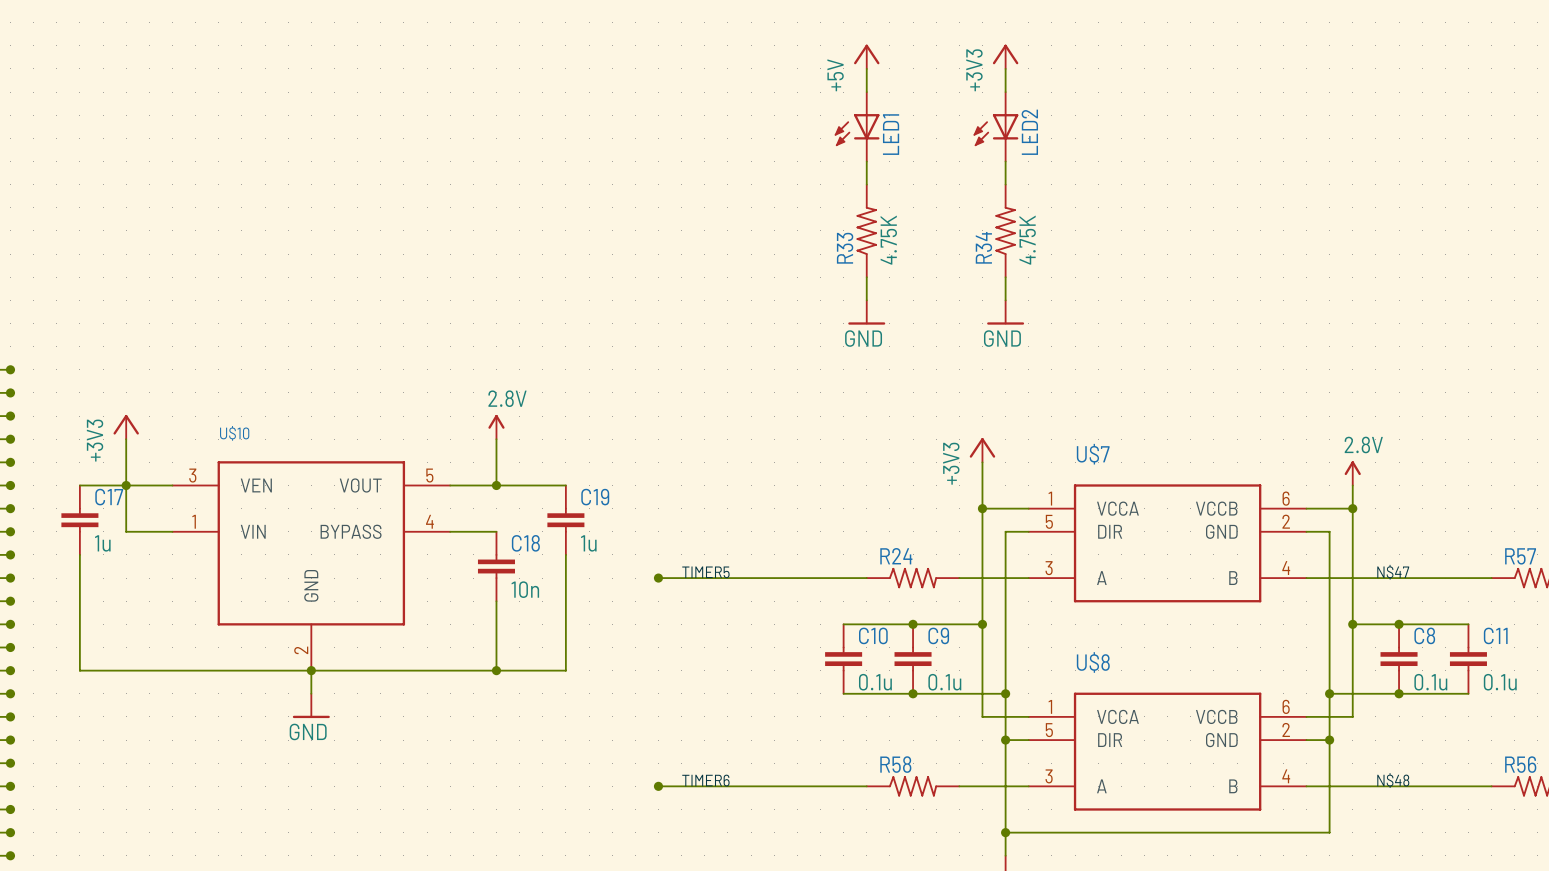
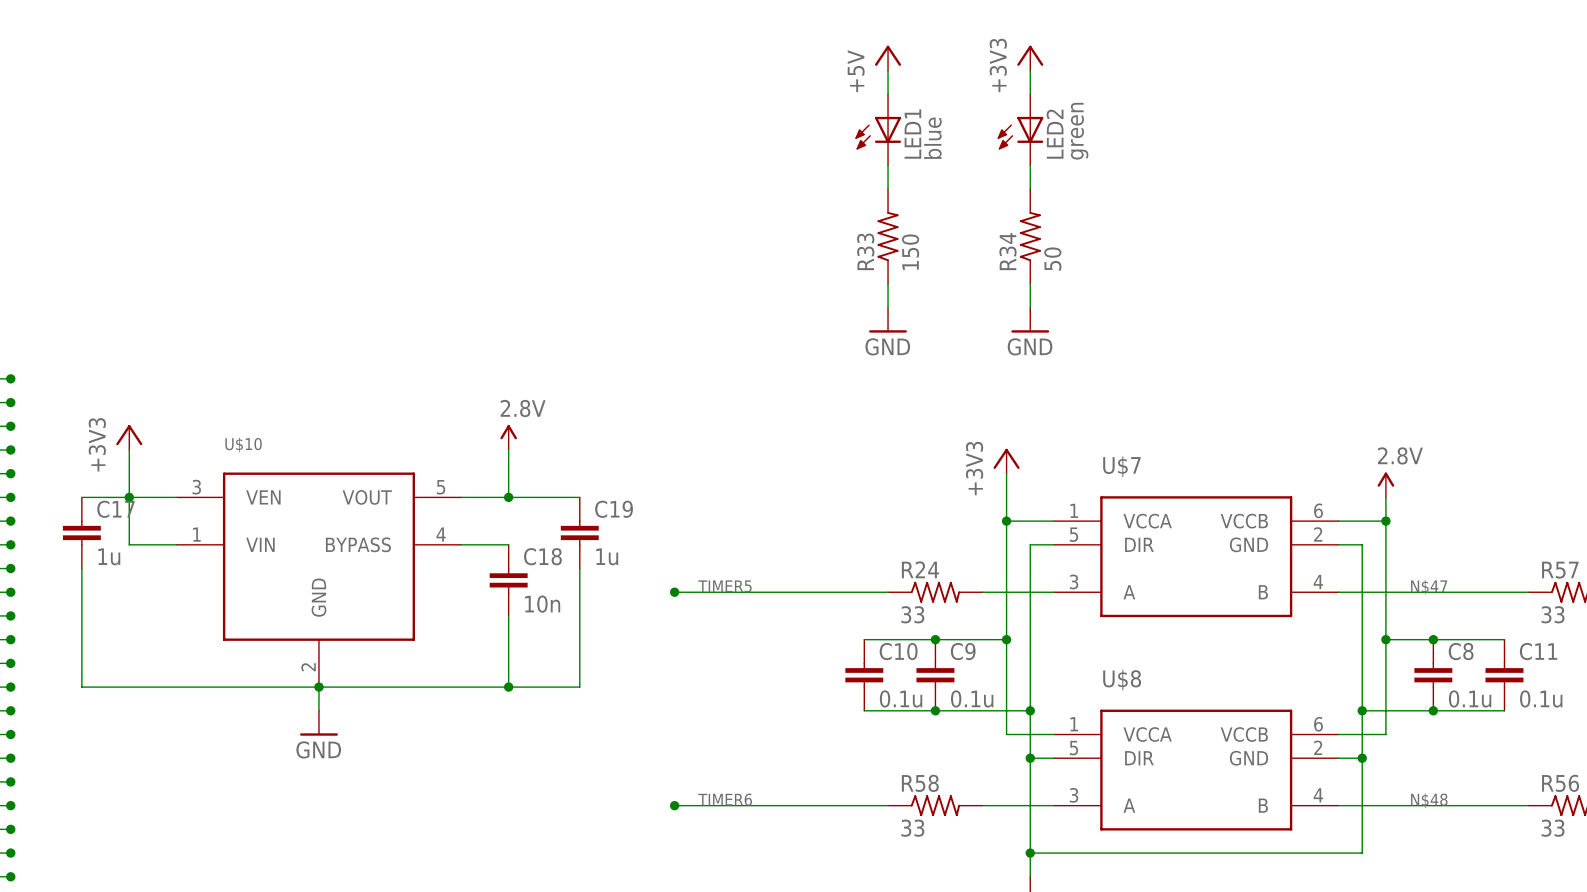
LED2 value: none -> green (1079, 131)
LED1 value: none -> blue (932, 138)
R33 value: 4.75K (888, 240) -> 150 (910, 252)
R34 value: 4.75K (1027, 240) -> 50 (1052, 259)
R24 value: none -> 33 (912, 614)
R57 value: none -> 33 (1553, 614)
R58 value: none -> 33 (912, 828)
R56 value: none -> 33 (1553, 828)

